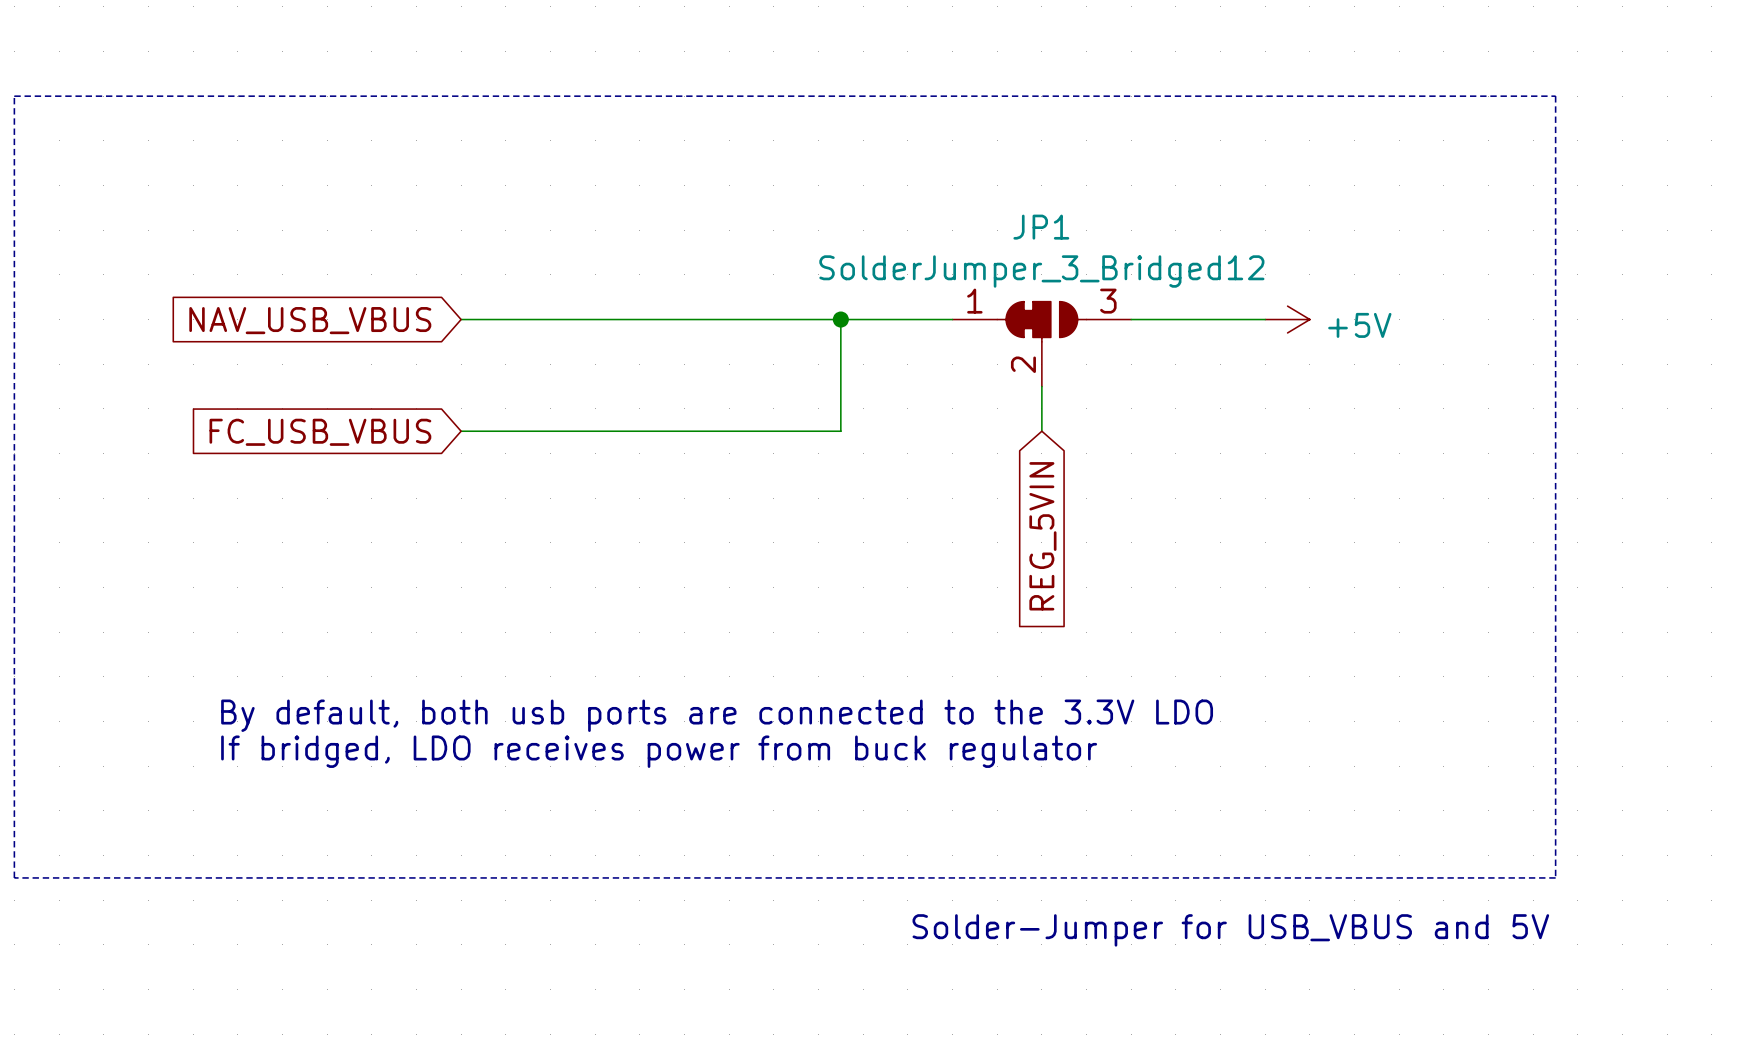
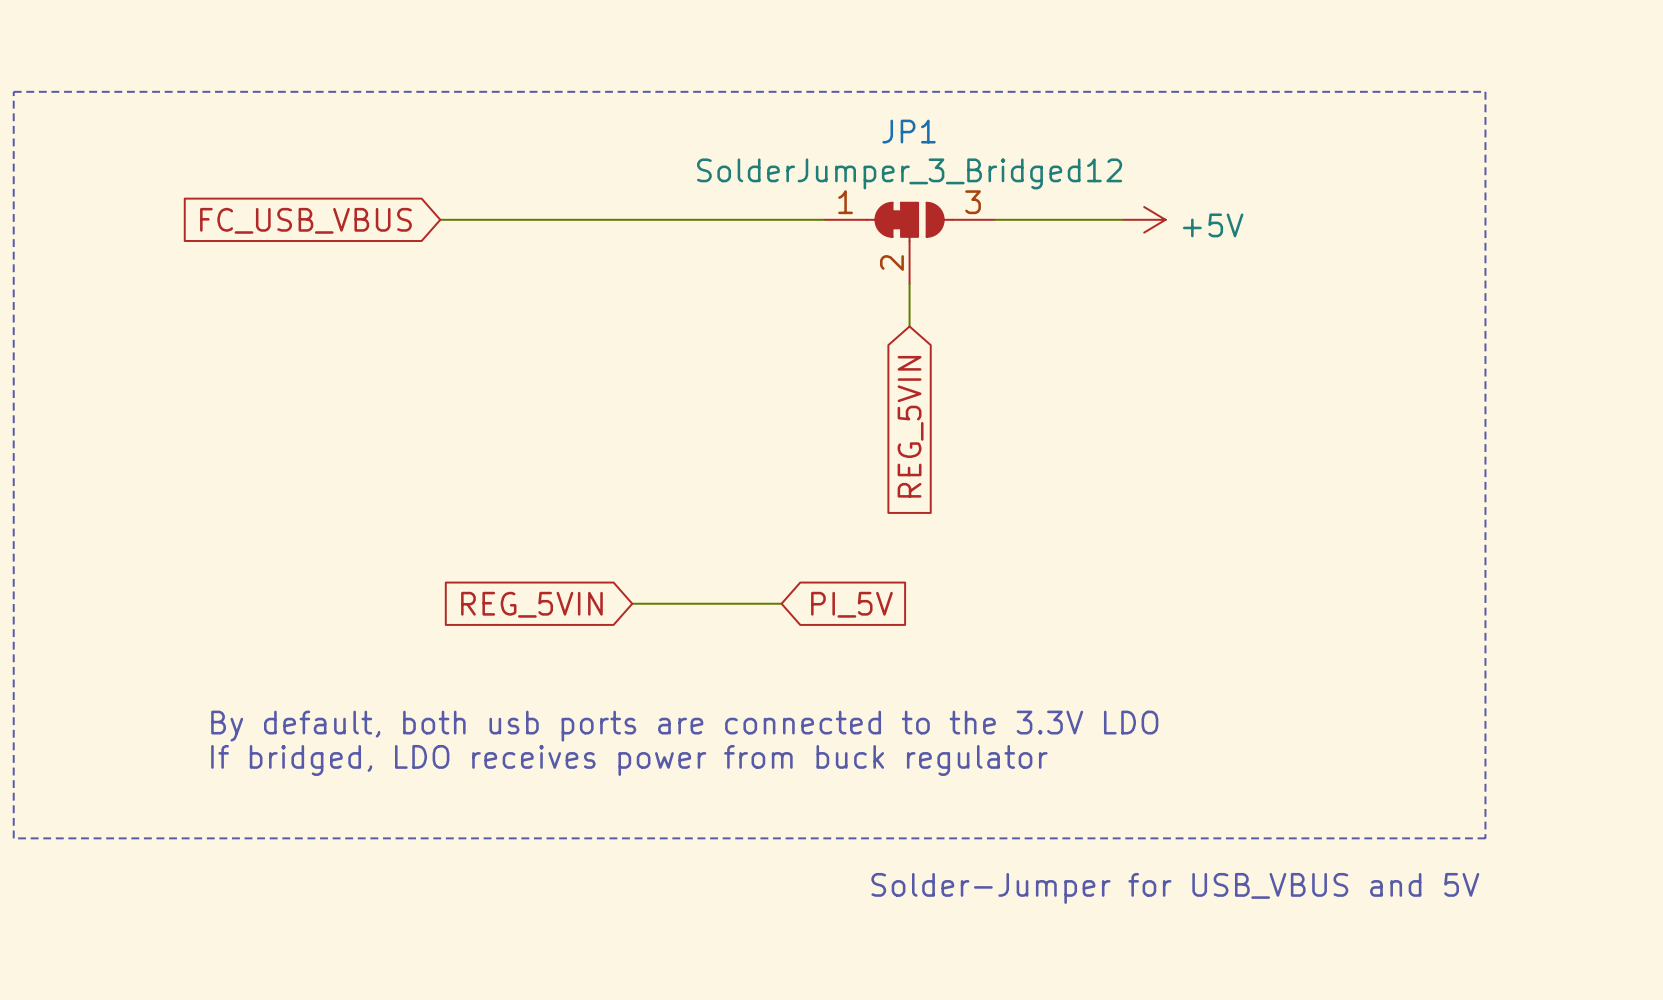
wire: none -> (440, 219) (824, 219)
wire: (461, 319) (952, 319) -> none
wire: (840, 319) (840, 431) (461, 431) -> none
junction: (840, 319) -> none
wire: (1131, 319) (1265, 319) -> (994, 219) (1122, 219)
power symbol position: +5V (1287, 319) -> +5V (1144, 219)
global label: NAV_USB_VBUS (310, 320) -> none
JP1 position: (1041, 344) -> (909, 243)
wire: (1041, 386) (1041, 431) -> (909, 283) (909, 326)
global label position: FC_USB_VBUS (320, 432) -> FC_USB_VBUS (305, 220)
global label position: REG_5VIN (1042, 536) -> REG_5VIN (910, 426)
wire: none -> (632, 603) (781, 603)
global label: none -> REG_5VIN (531, 604)
global label: none -> PI_5V (851, 604)
text position: By default, both usb ports are connected to the 3.3V LDO (717, 715) -> By default, both usb ports are connected to the 3.3V LDO (684, 726)
text position: If bridged, LDO receives power from buck regulator (659, 751) -> If bridged, LDO receives power from buck regulator (629, 760)

